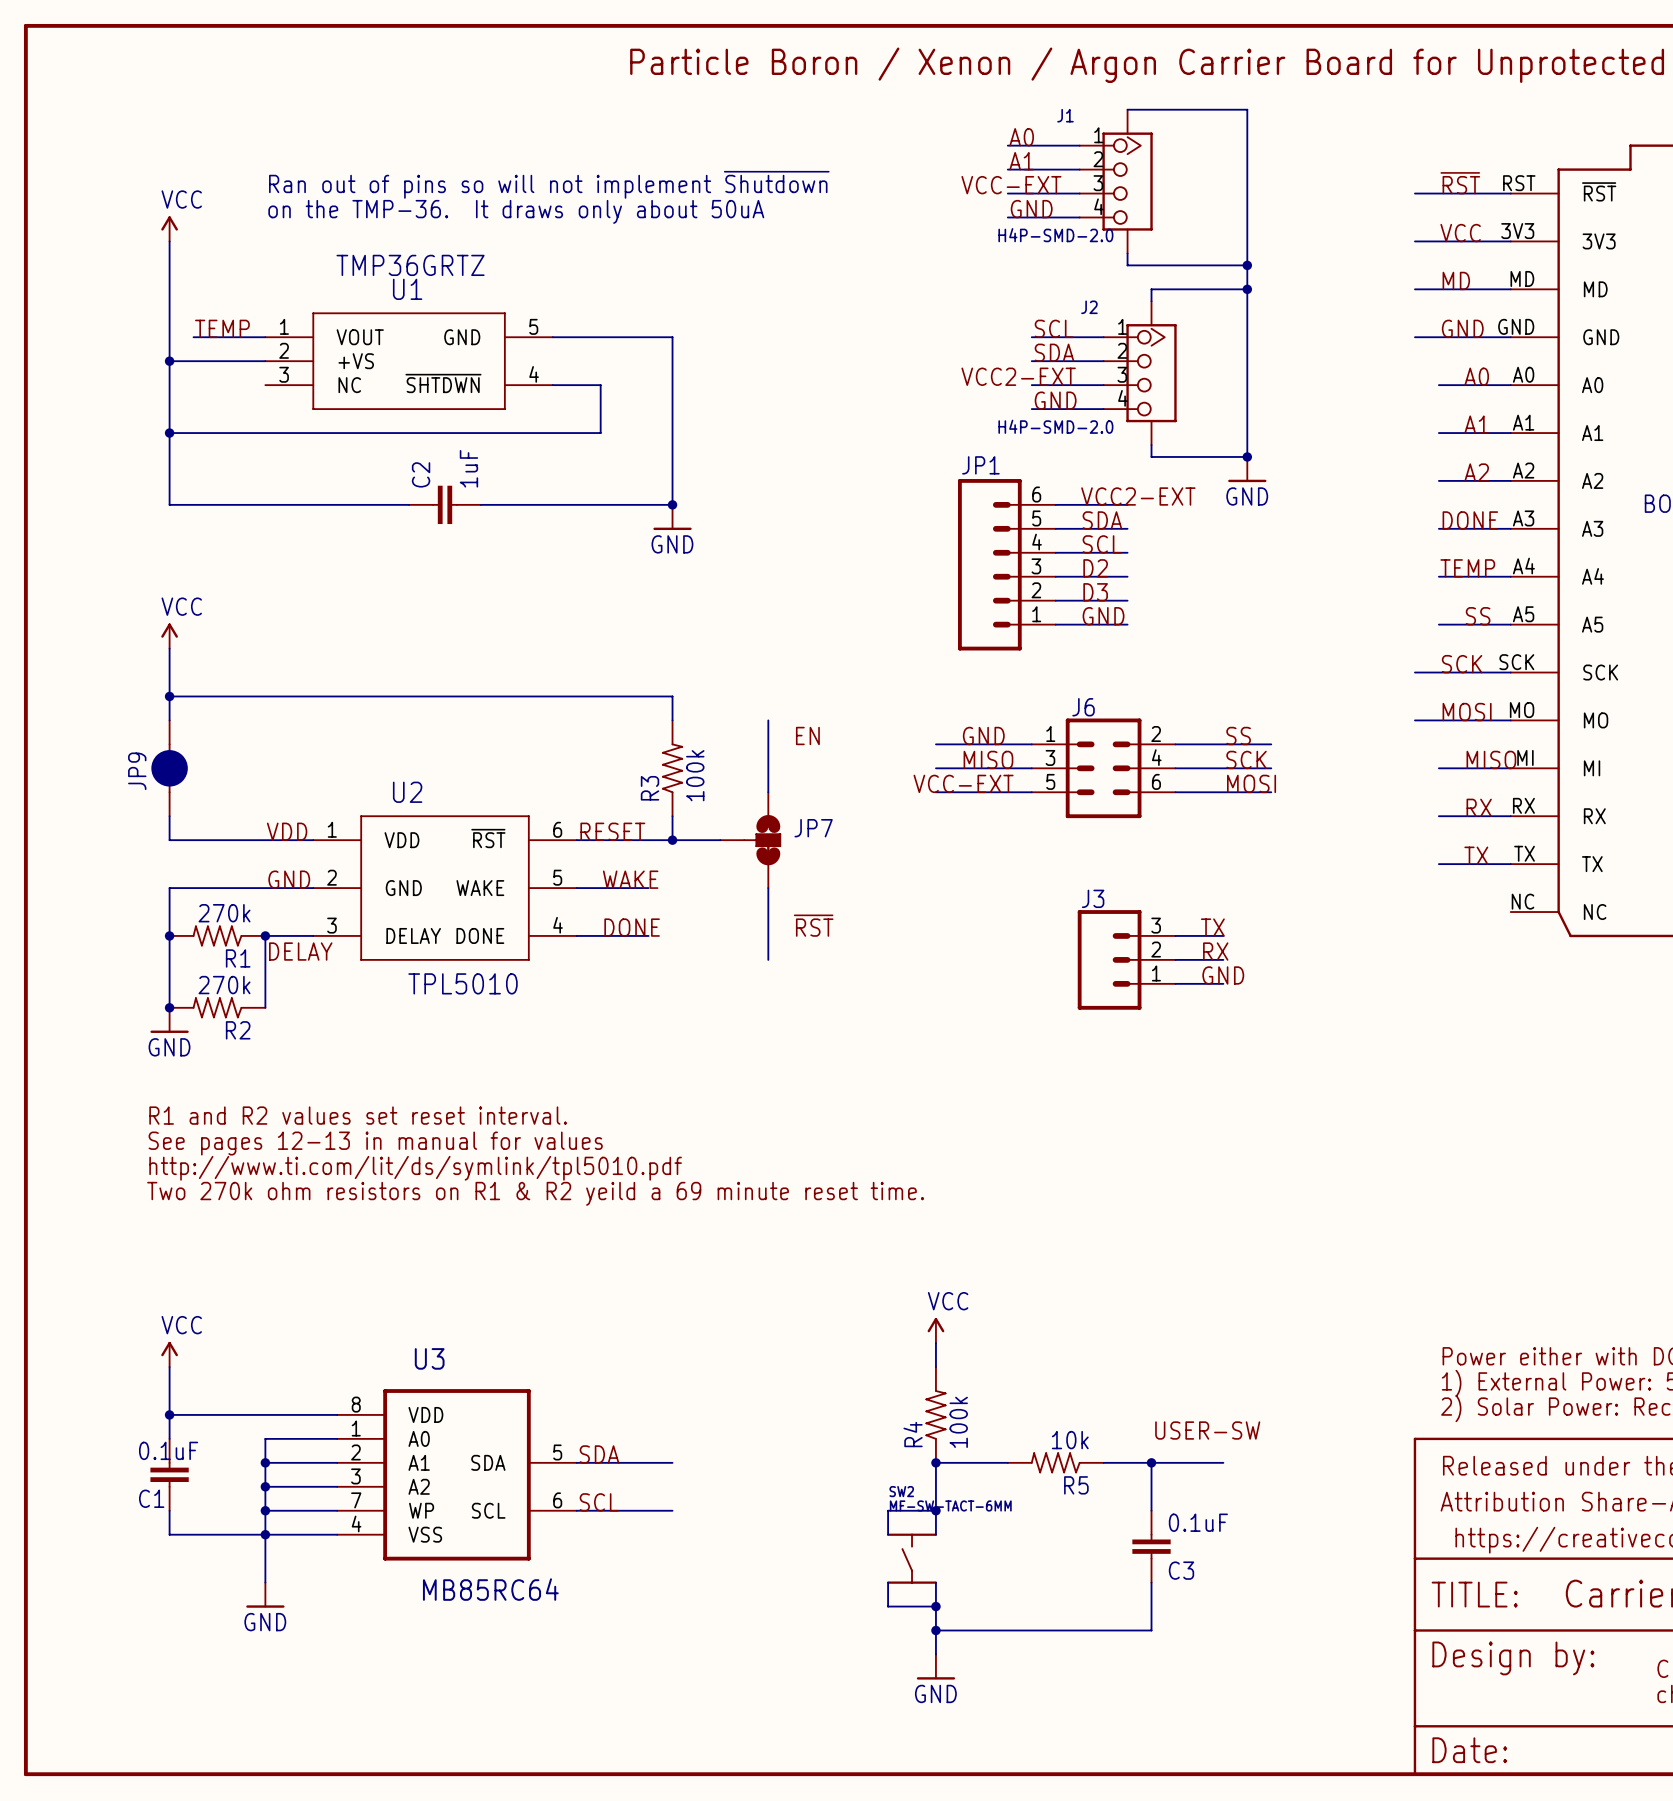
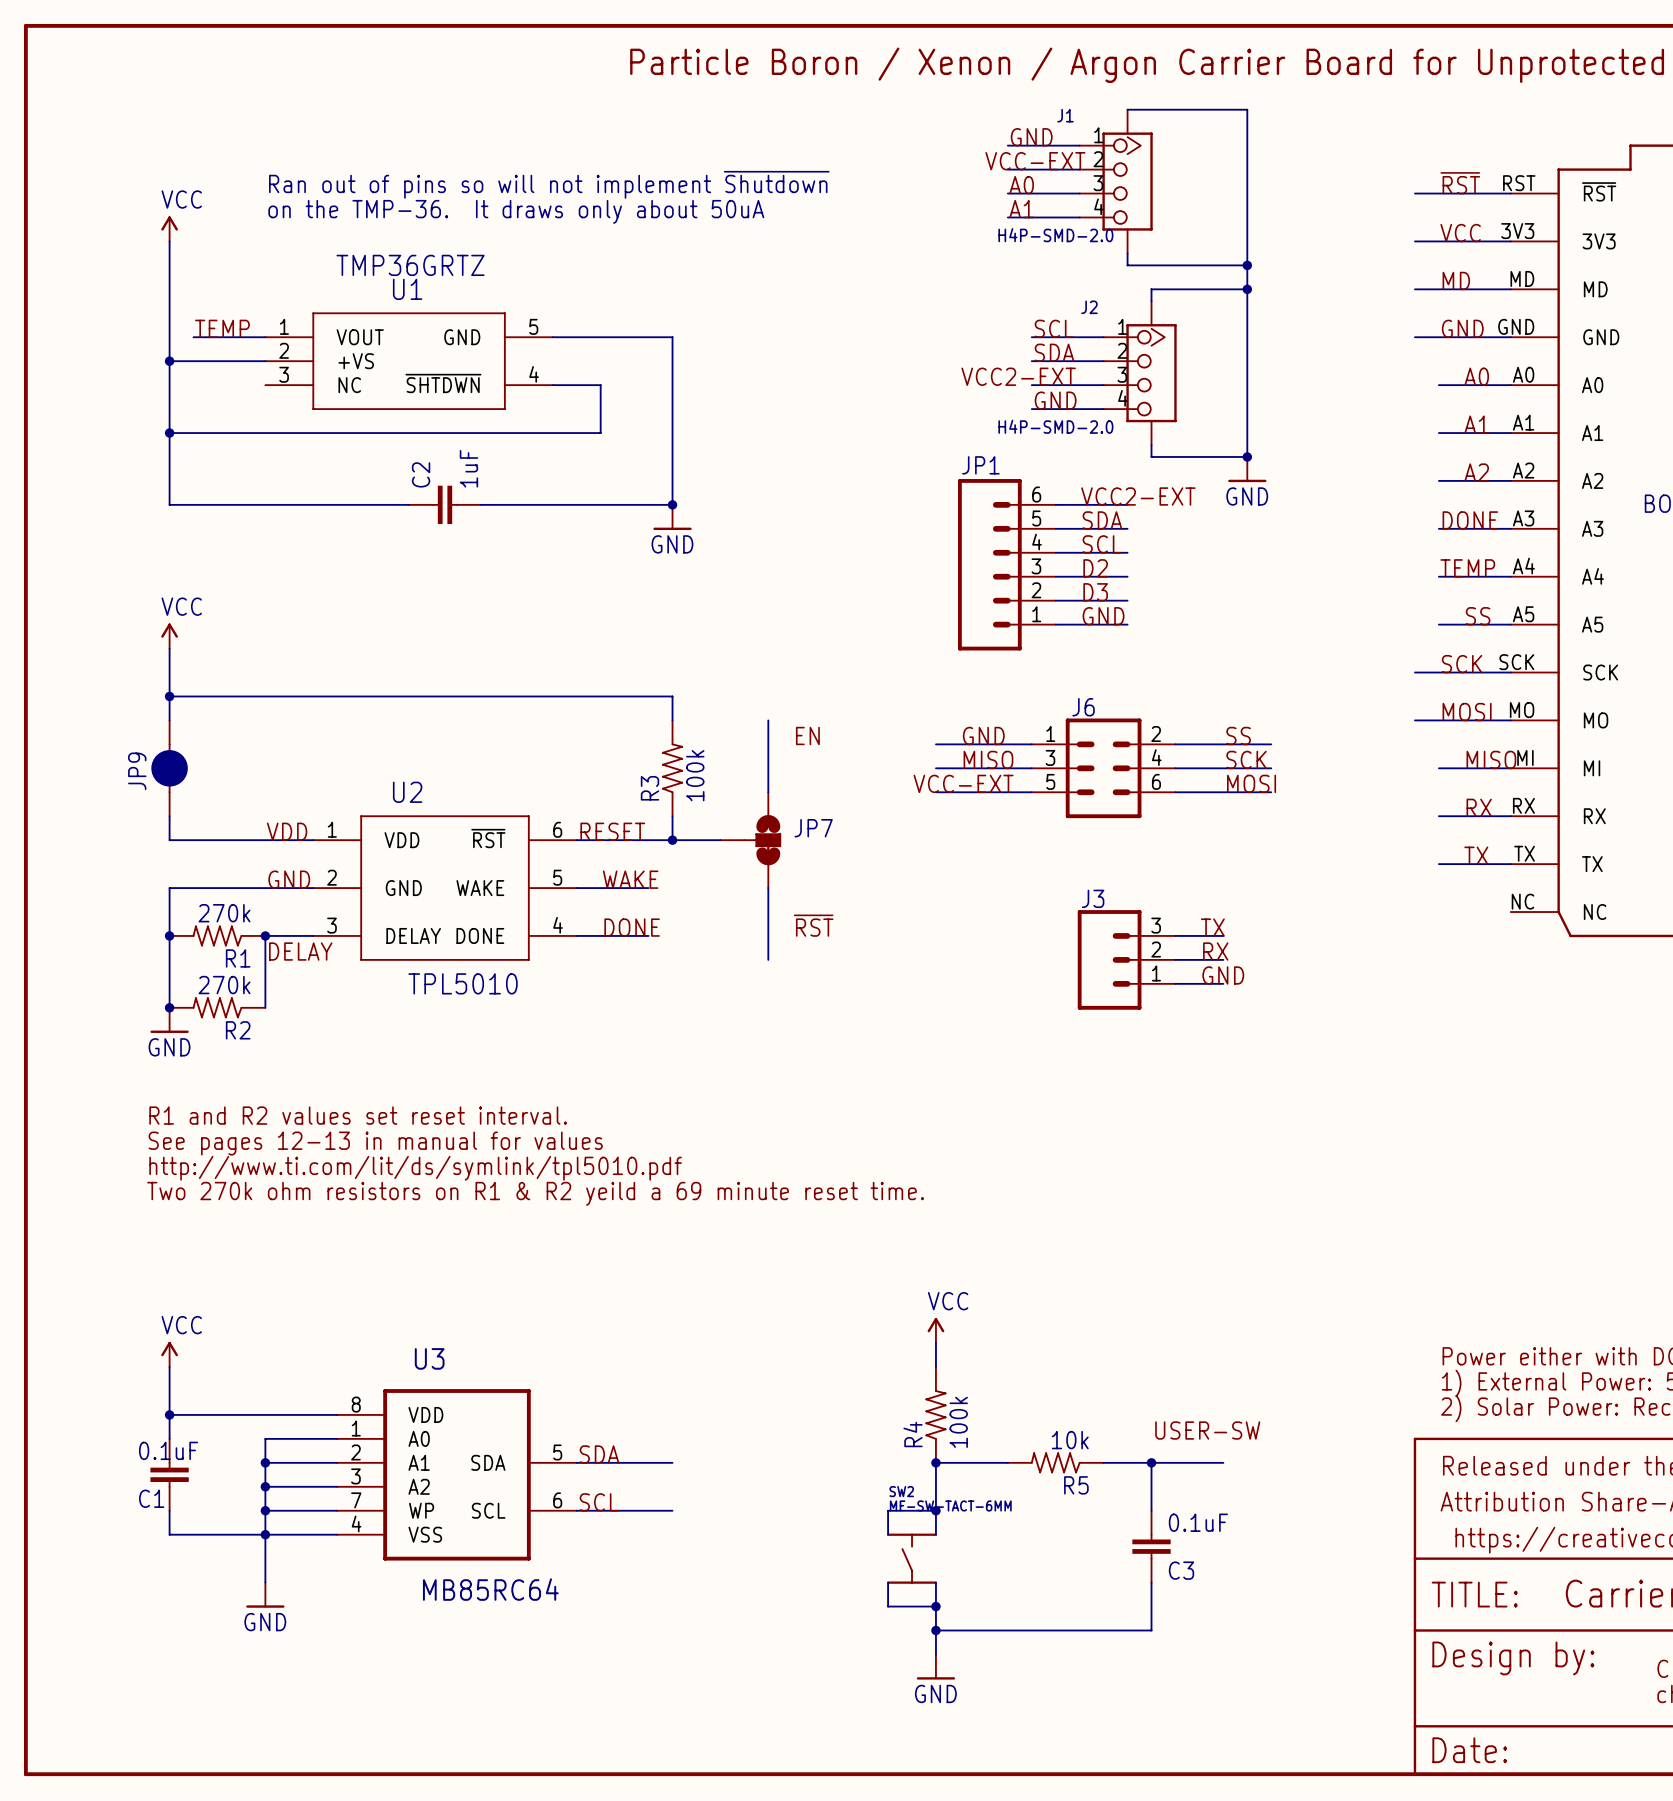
label: A0 (1021, 137) -> GND (1031, 137)
label: A1 (1021, 161) -> none
label position: VCC-EXT (1011, 185) -> VCC-EXT (1035, 161)
label: none -> A0 (1021, 185)
label: GND (1031, 209) -> A1 (1021, 209)

